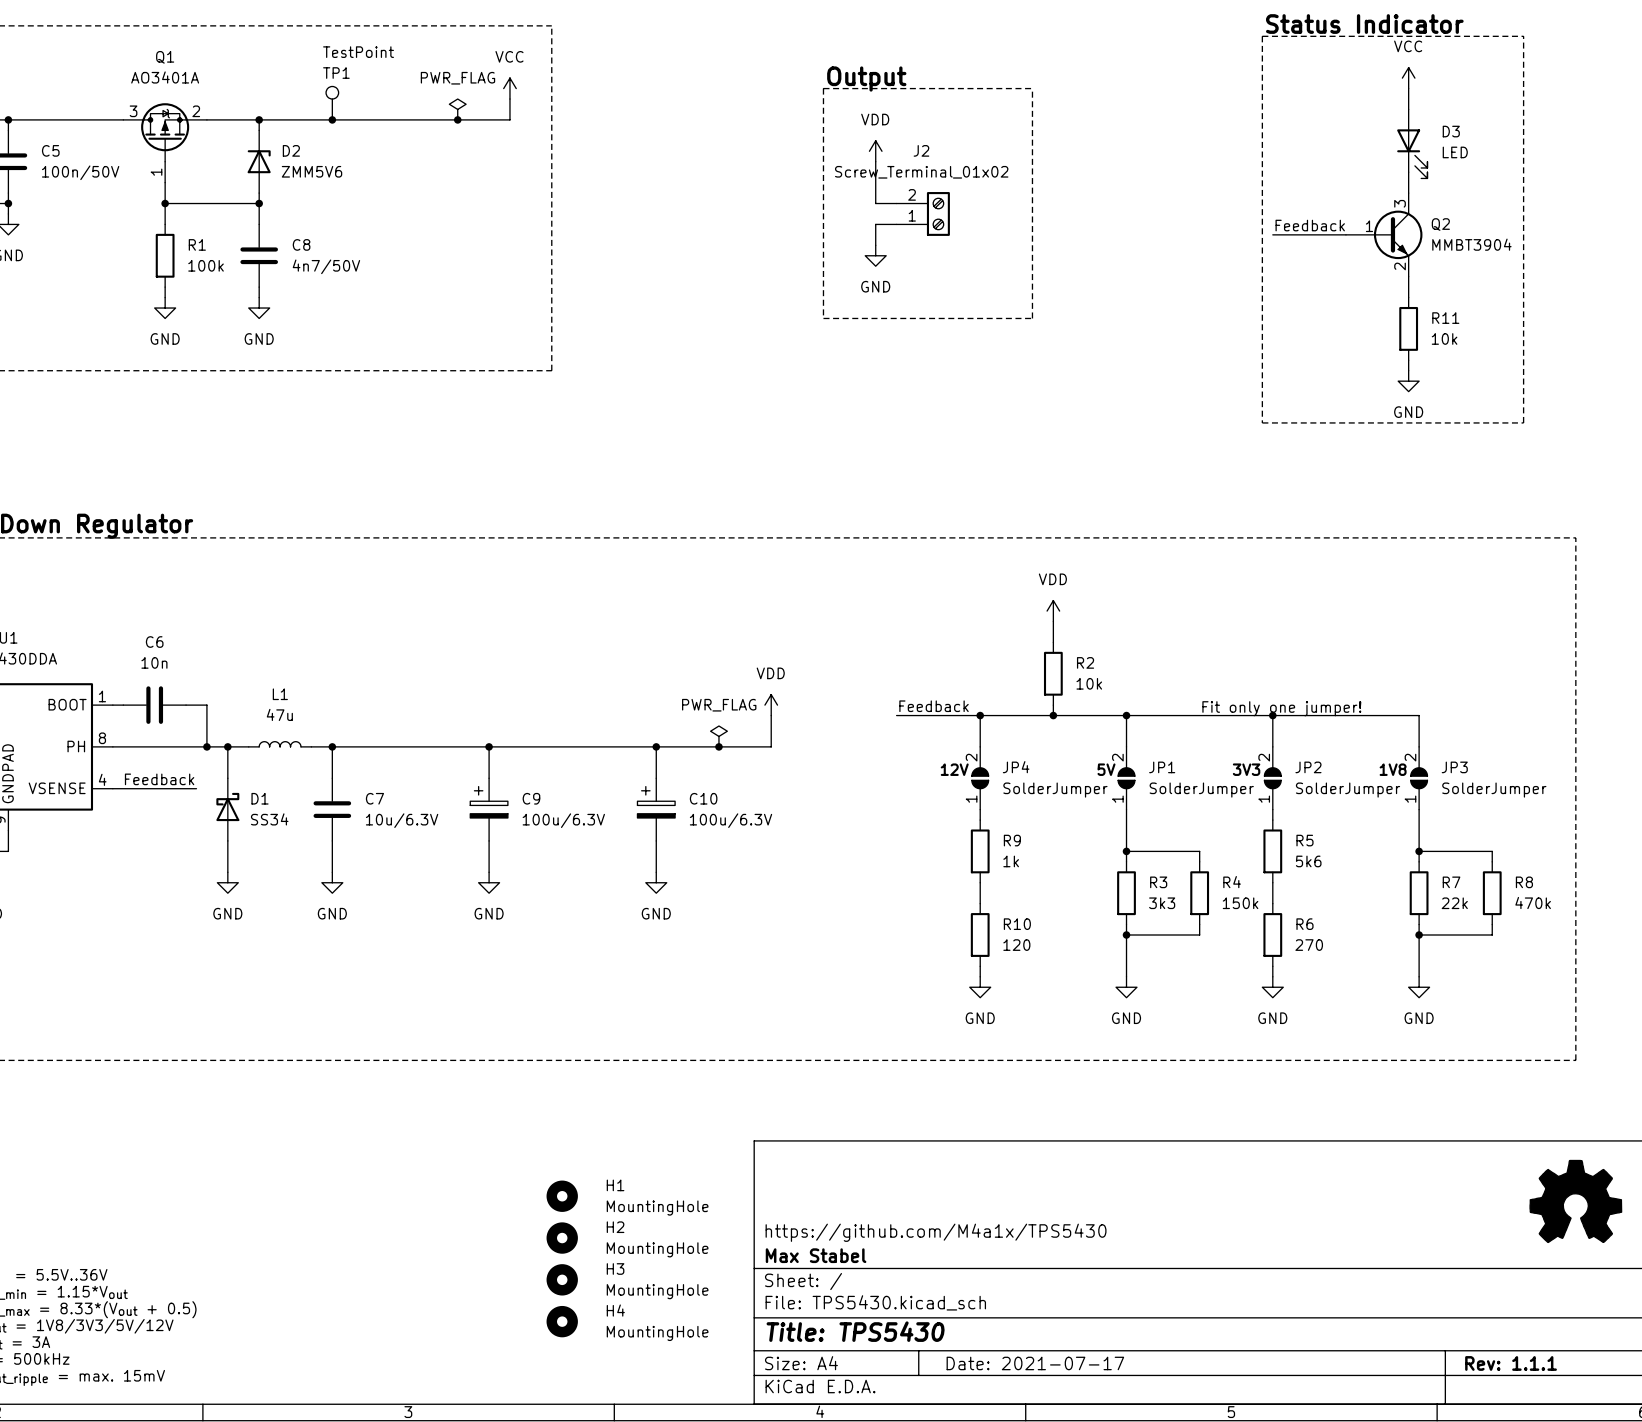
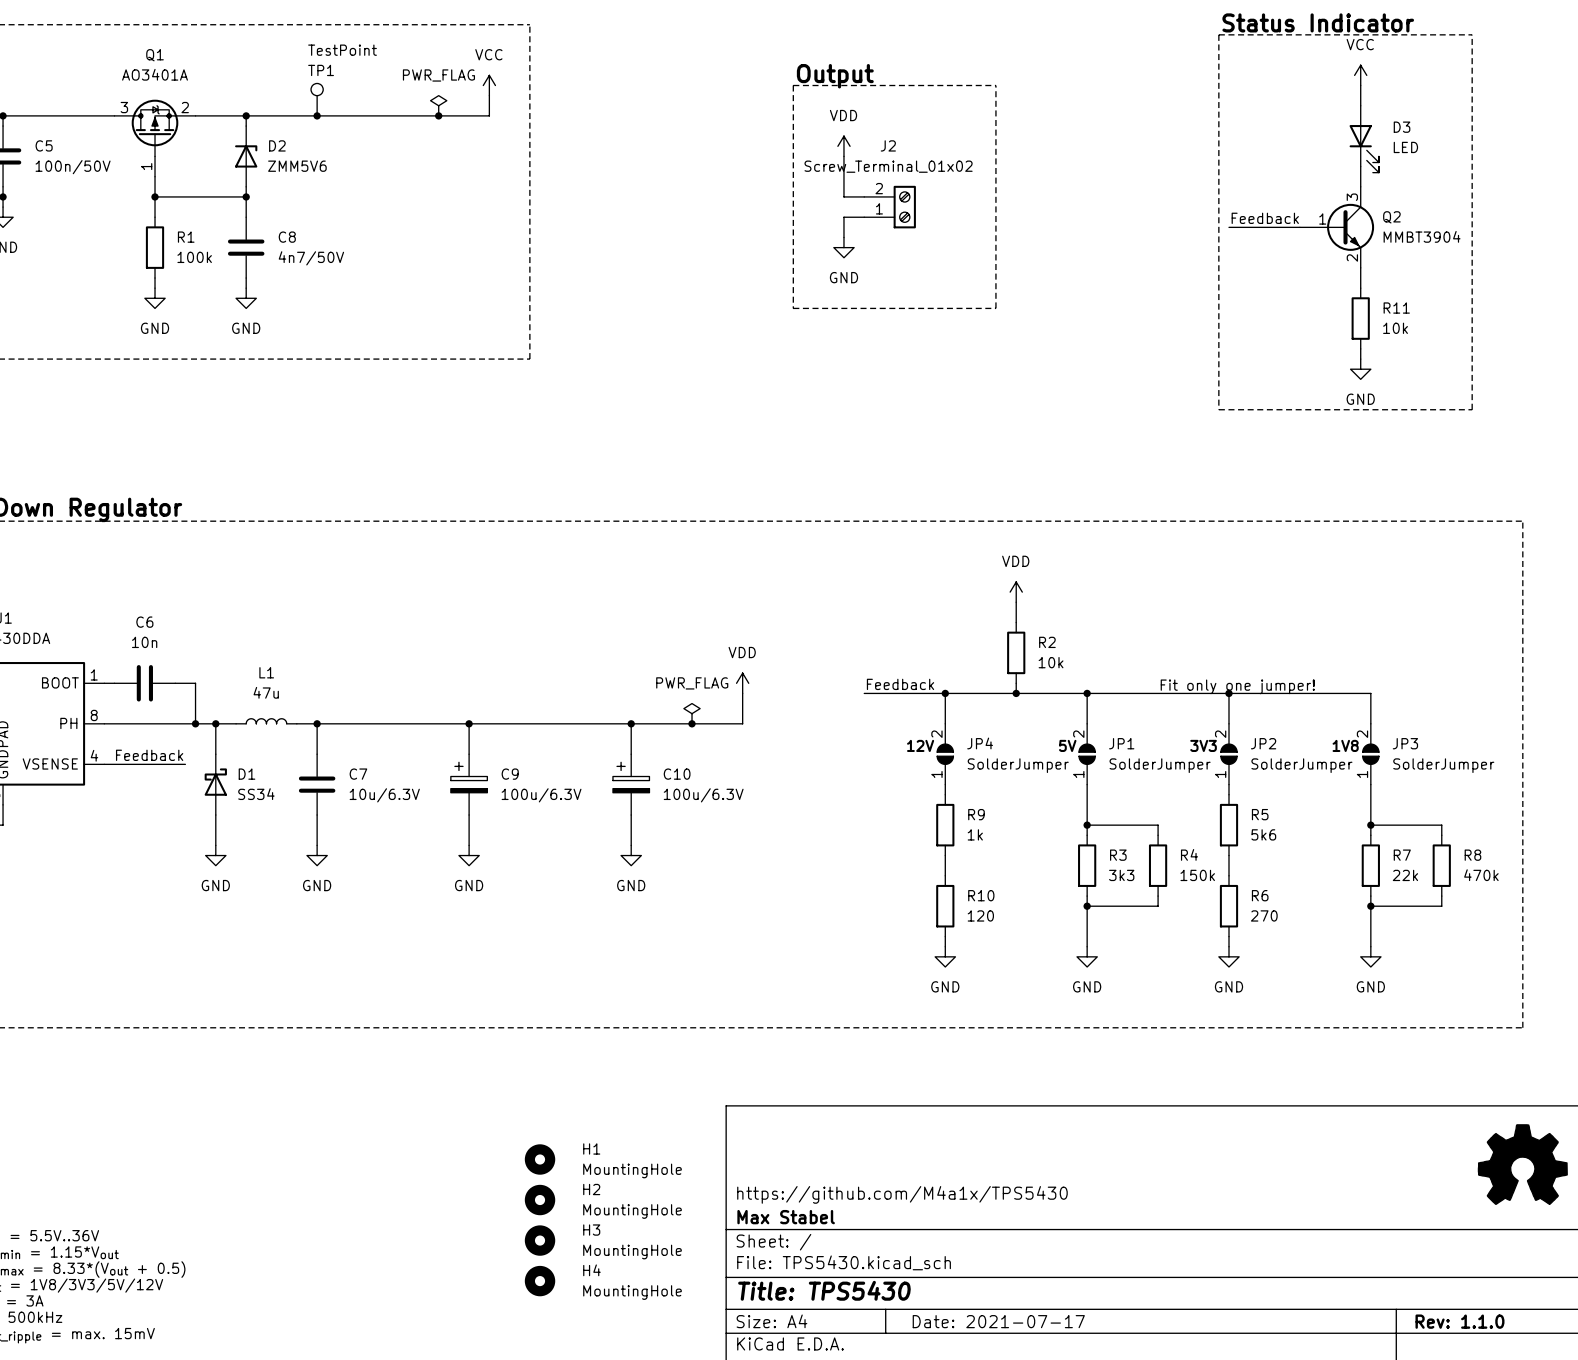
title block: Rev: 1.1.1 (1511, 1363) -> Rev: 1.1.0 (1459, 1321)

